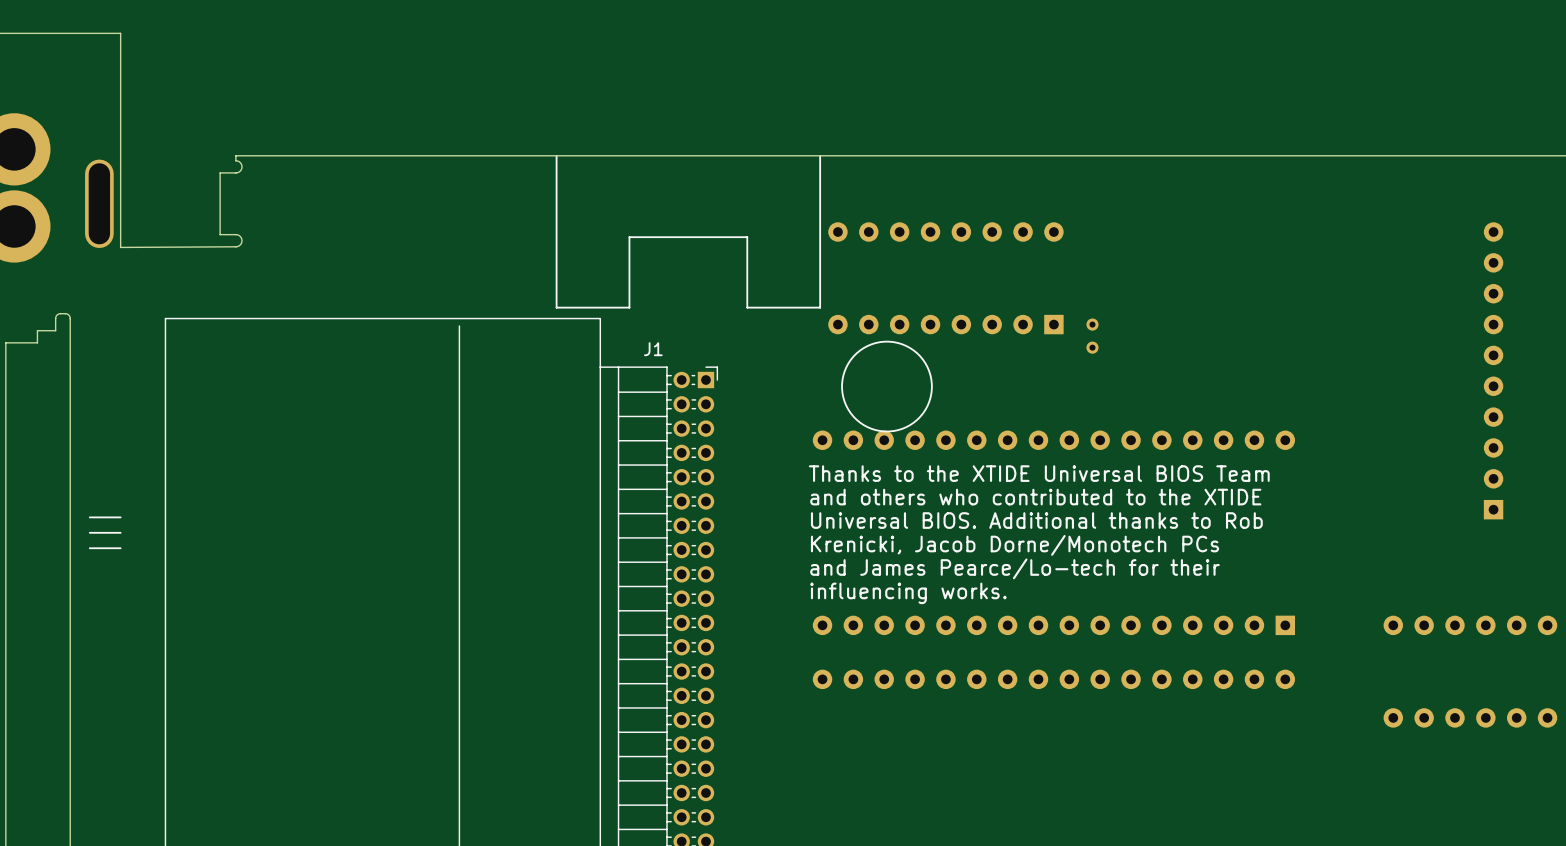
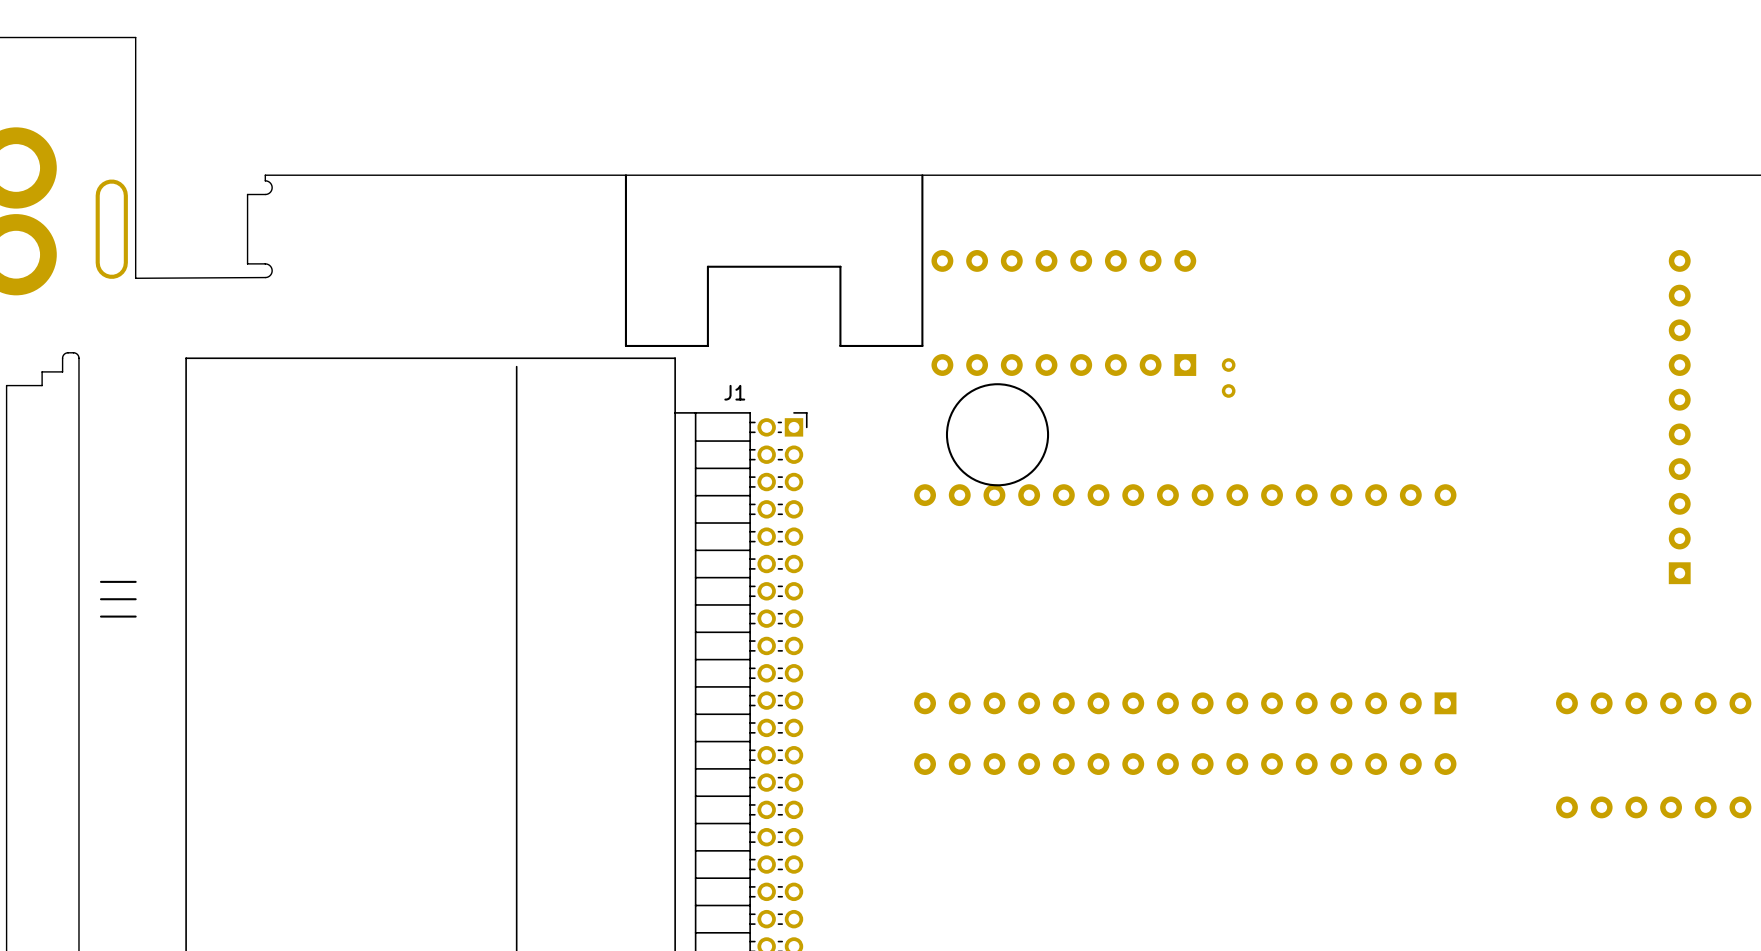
text: Thanks to the XTIDE Universal BIOS Team (1039, 473) -> none
text: and others who contributed to the XTIDE (1035, 497) -> none
text: Universal BIOS. Additional thanks to Rob (1036, 520) -> none
text: Krenicki, Jacob Dorne/Monotech PCs (1014, 545) -> none
text: and James Pearce/Lo-tech for their (1014, 568) -> none
text: influencing works. (908, 593) -> none

